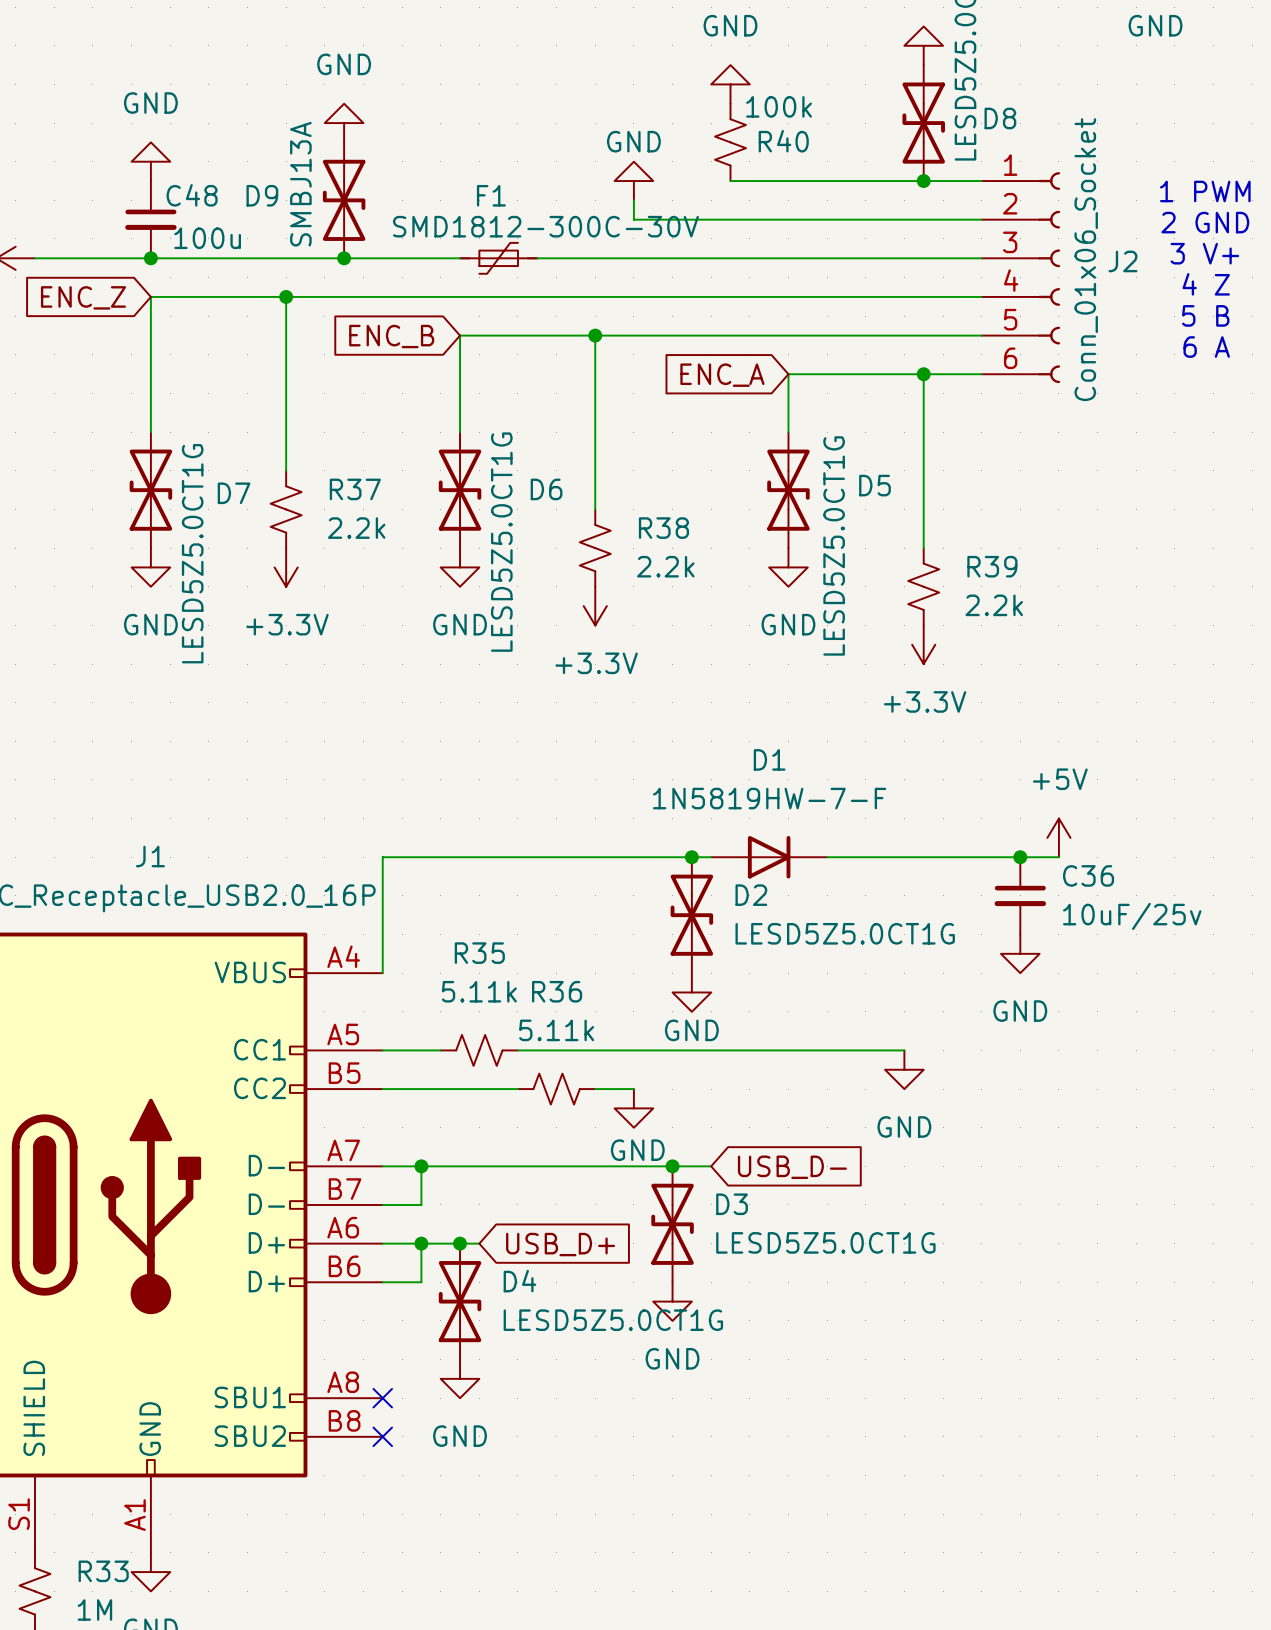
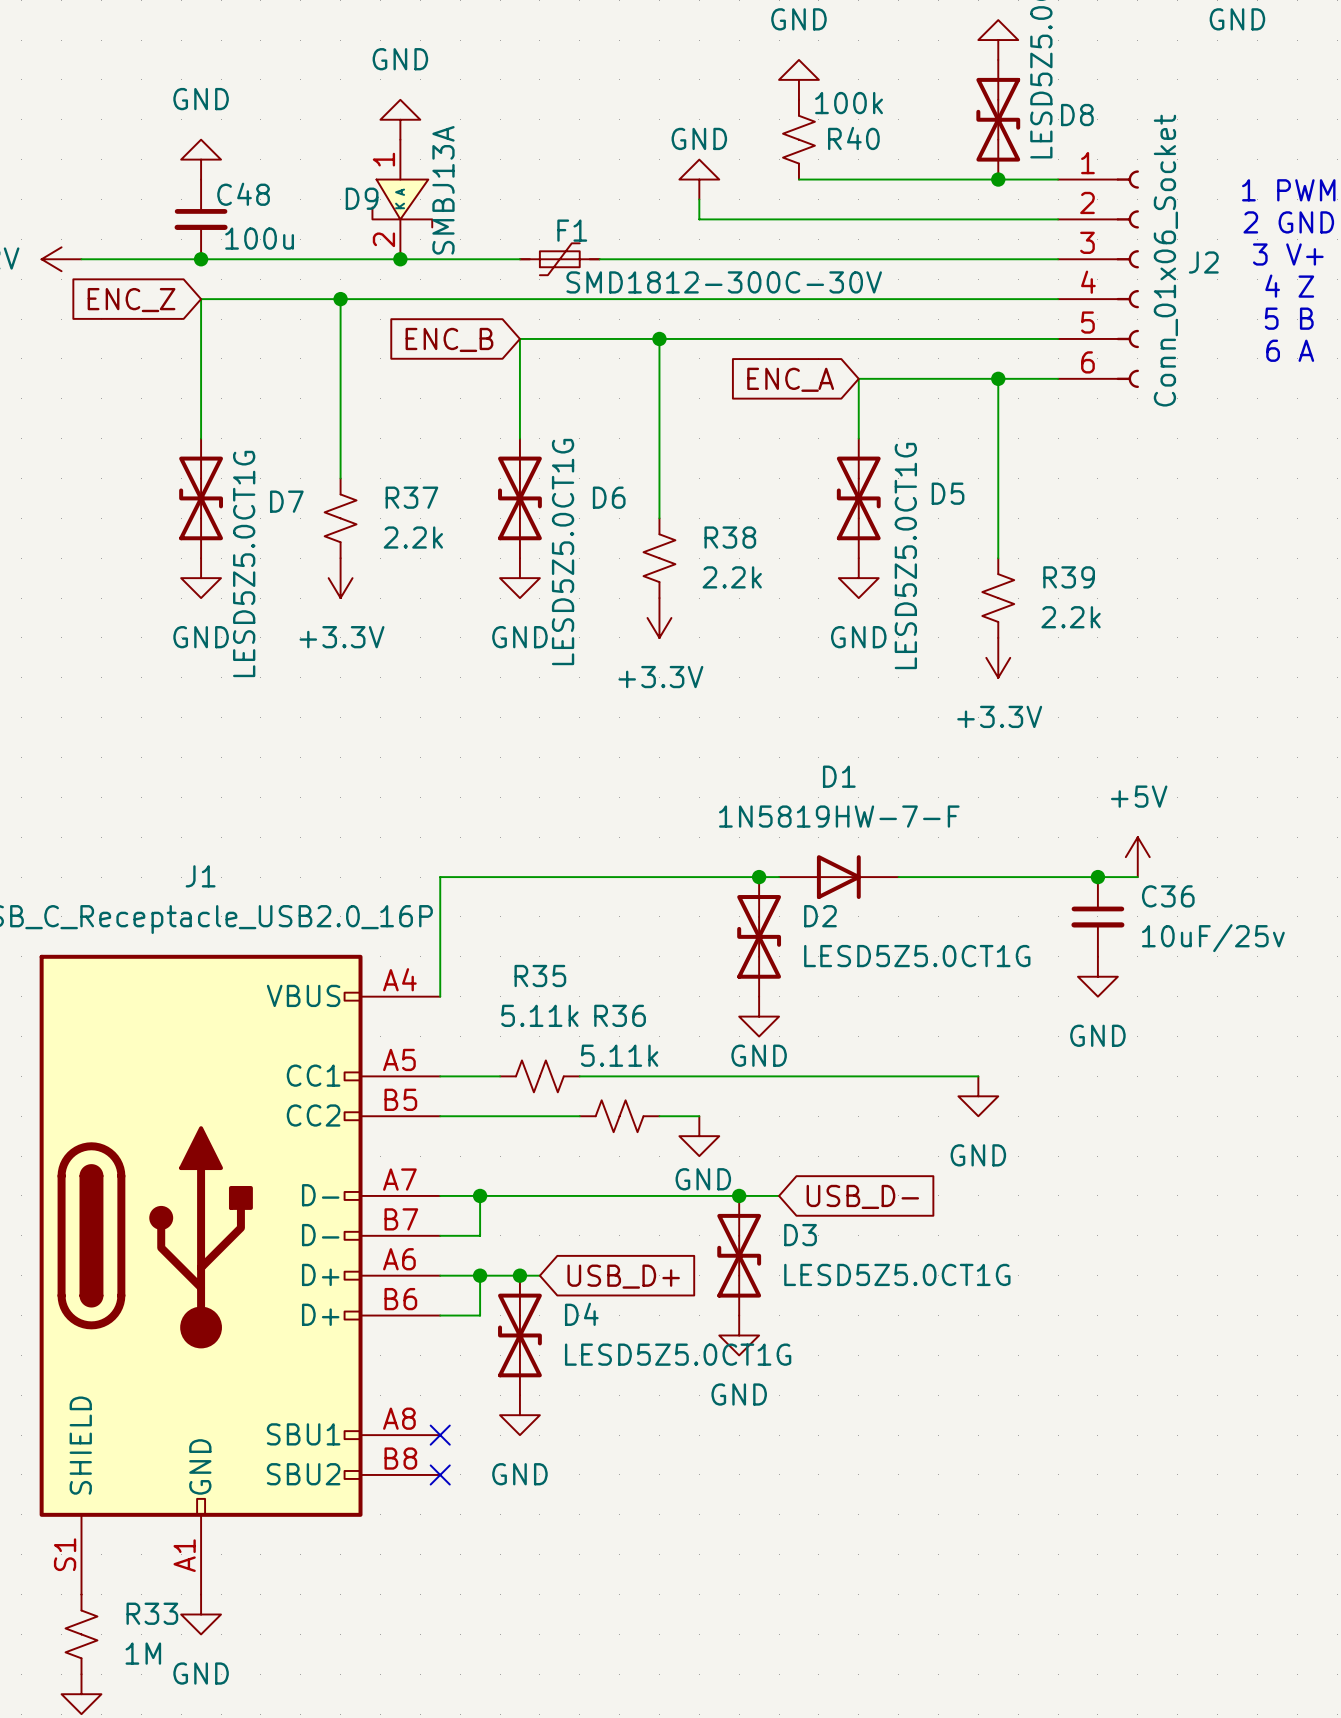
D9 symbol: [322, 142, 366, 259] -> [372, 139, 433, 260]
D9 value position: SMBJ13A (300, 184) -> SMBJ13A (443, 190)
D9 name position: D9 (262, 195) -> D9 (362, 198)
F1 name position: F1 (491, 195) -> F1 (572, 230)
F1 value position: SMD1812-300C-30V (545, 226) -> SMD1812-300C-30V (724, 282)

